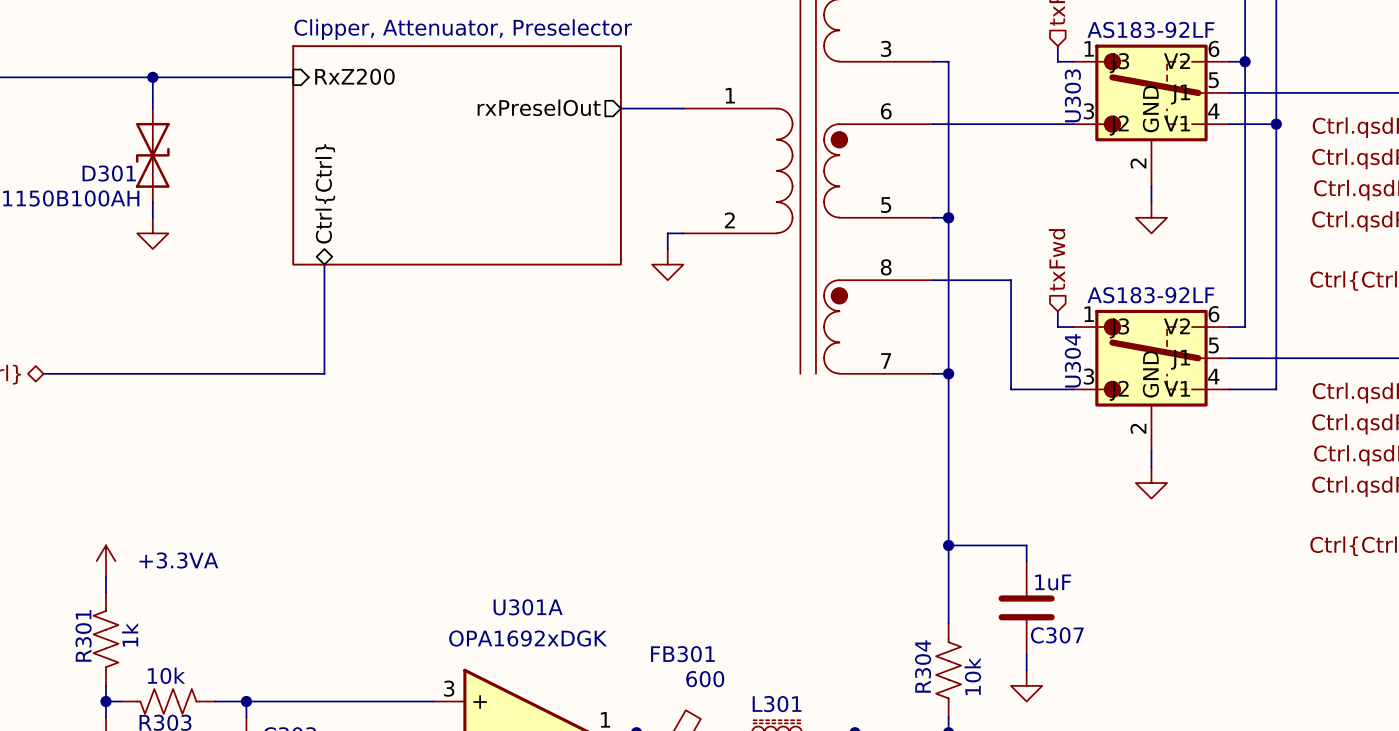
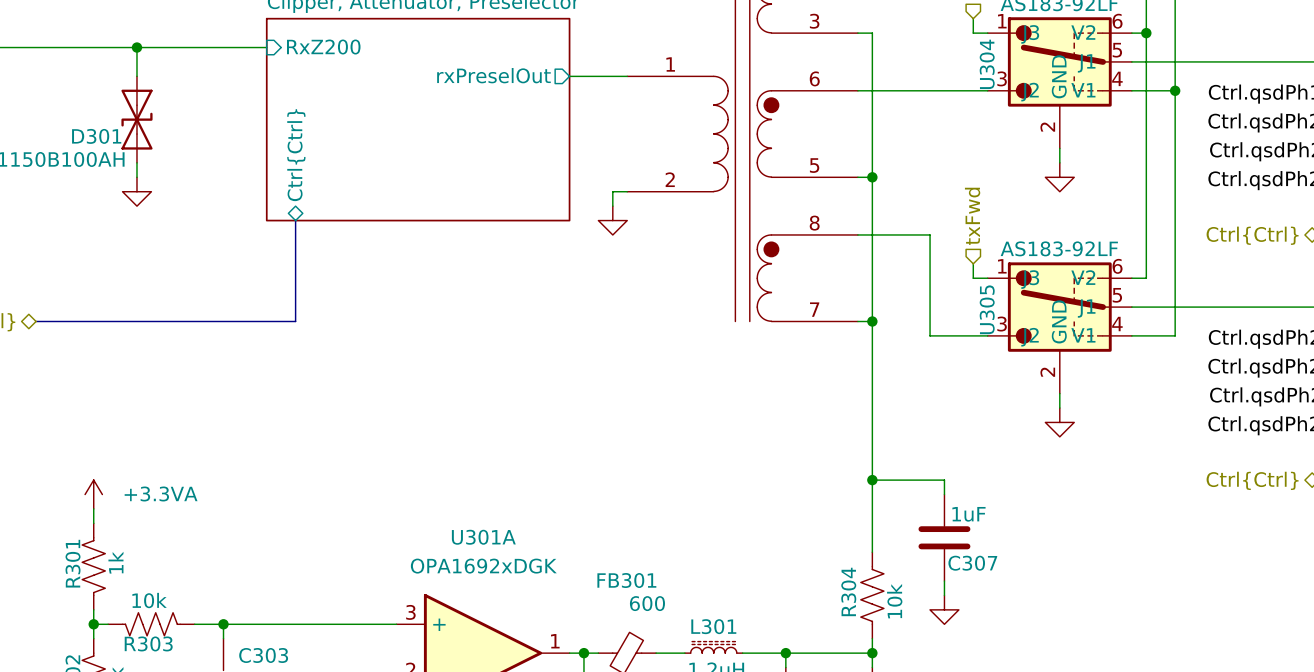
U303 name: U303 (1072, 95) -> U304 (987, 64)
U304 name: U304 (1072, 360) -> U305 (987, 309)

